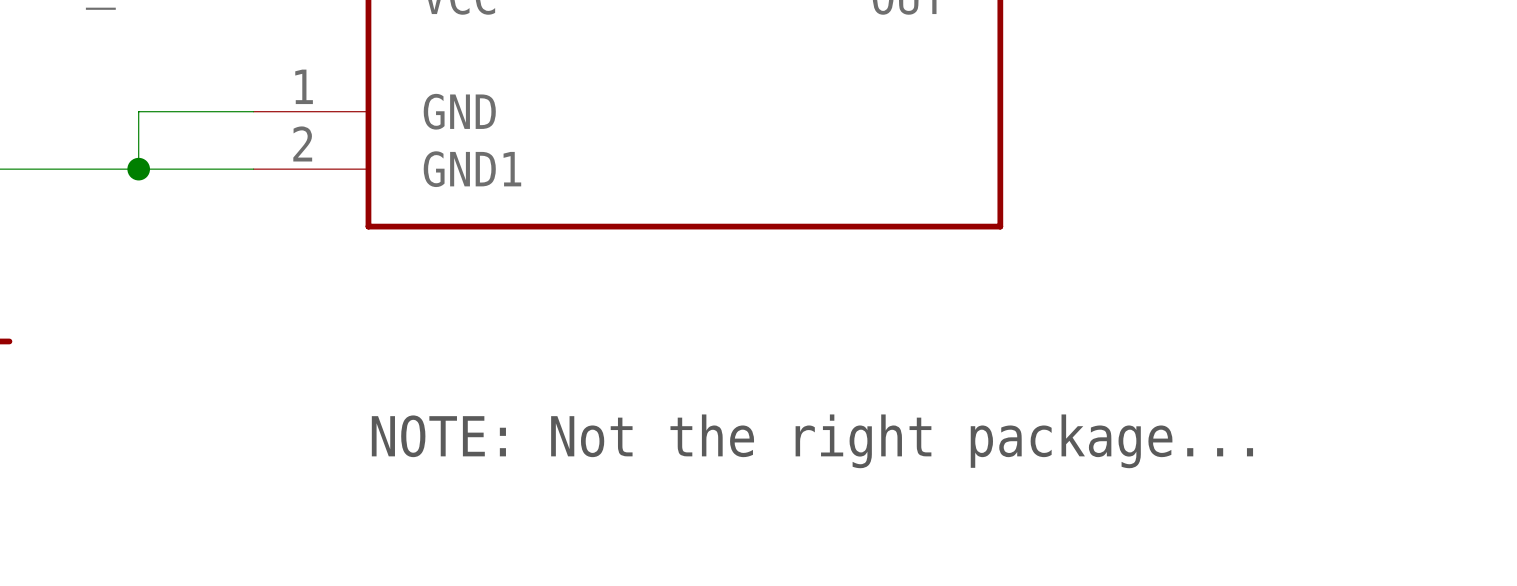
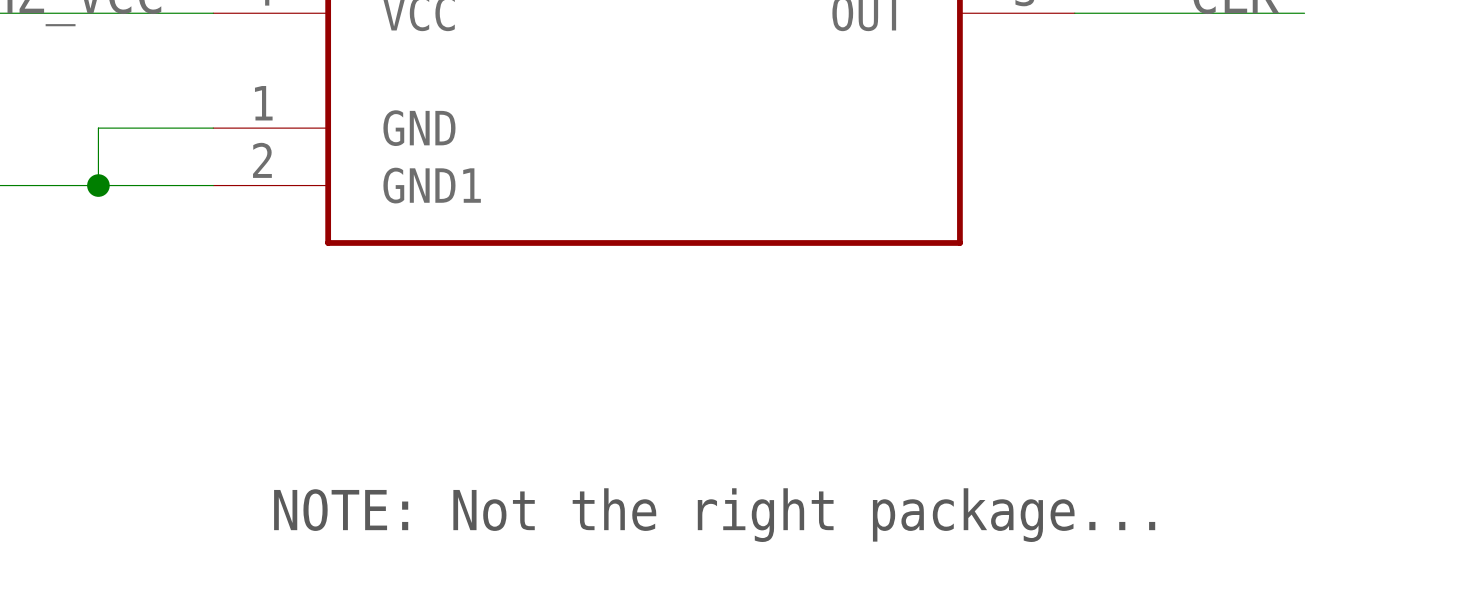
text position: NOTE: Not the right package... (812, 441) -> NOTE: Not the right package... (714, 515)

